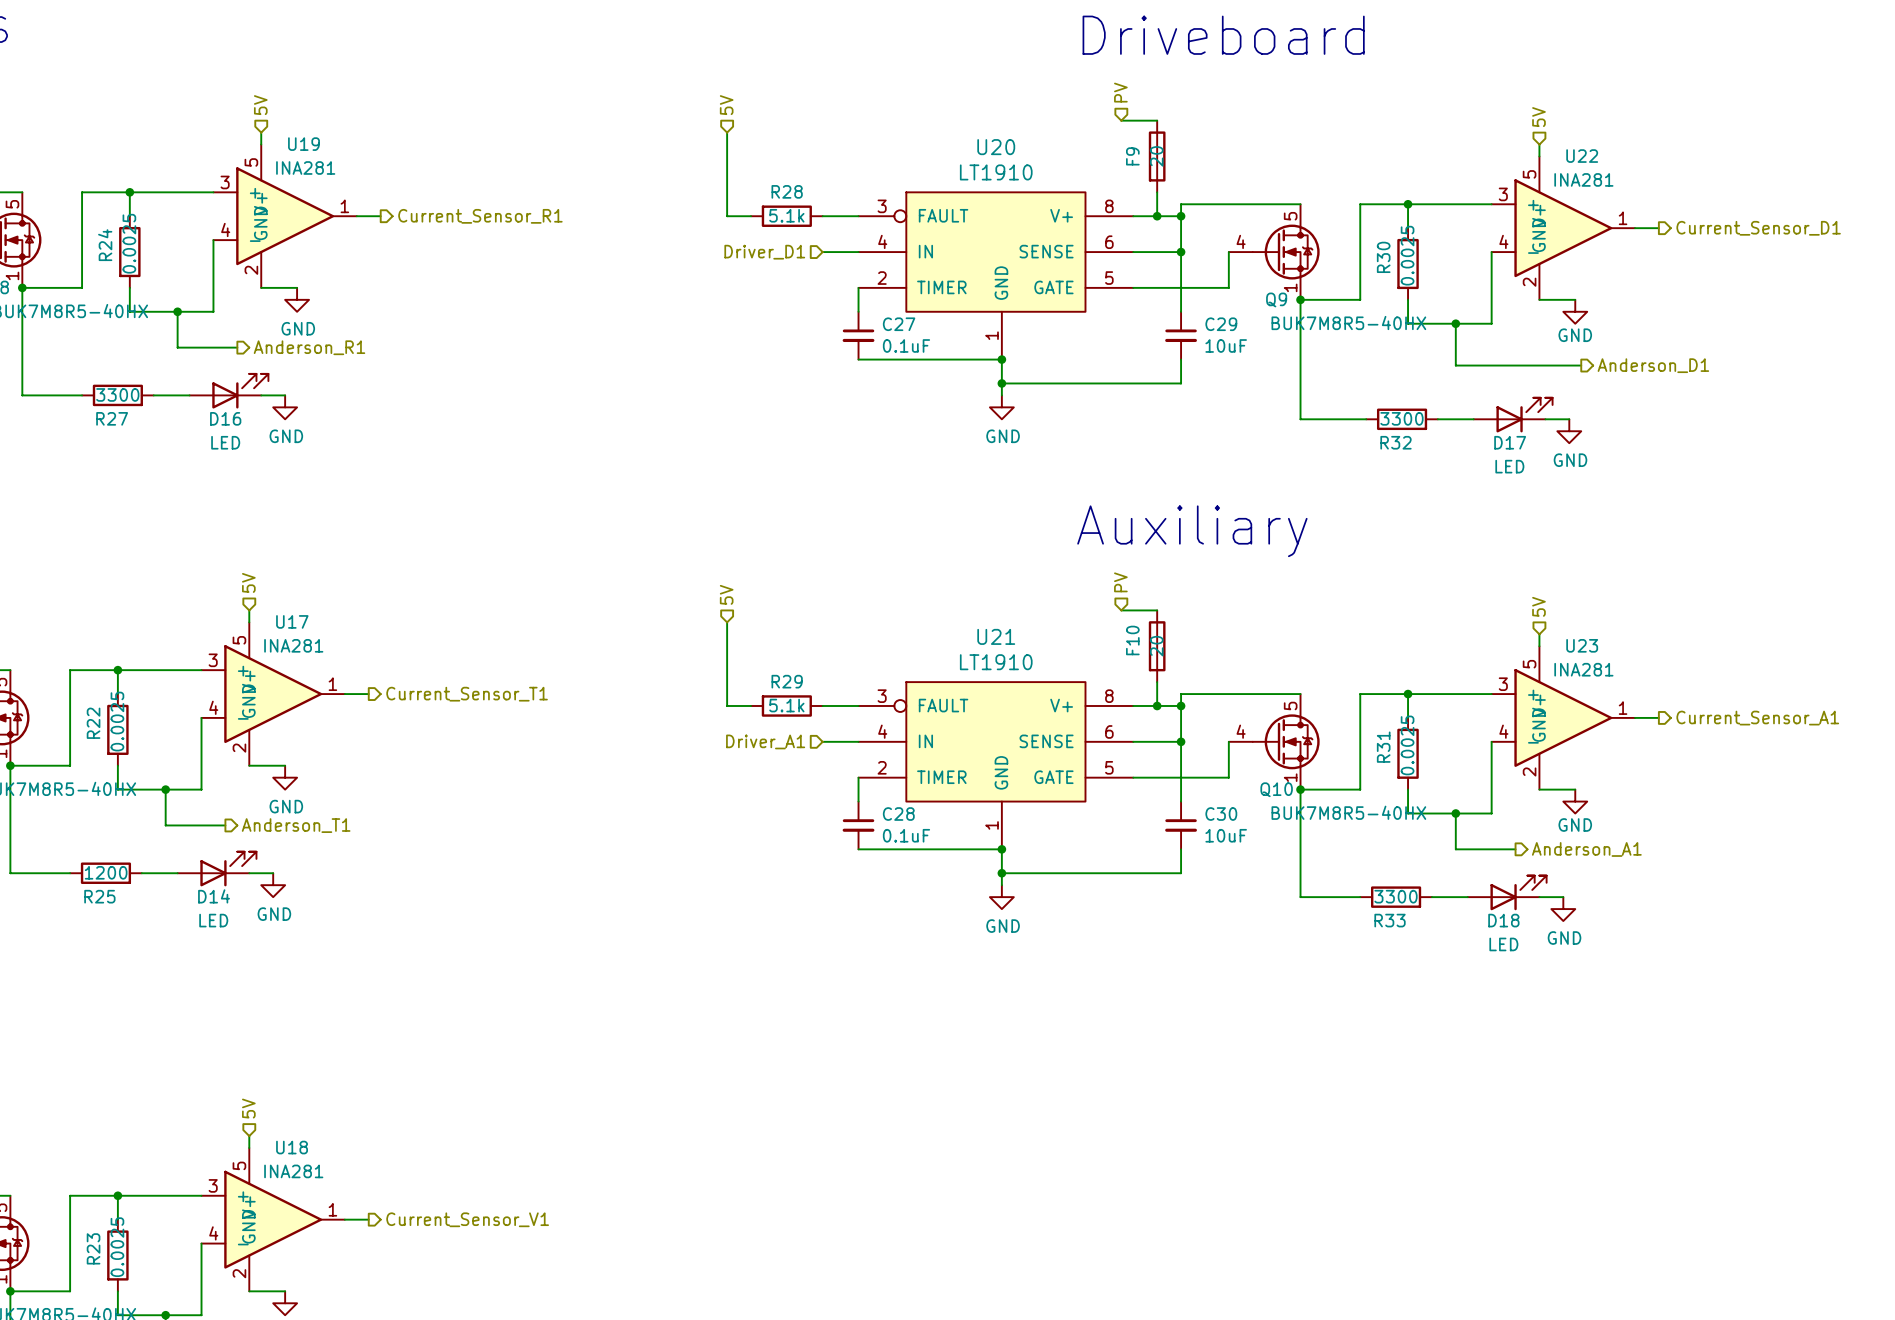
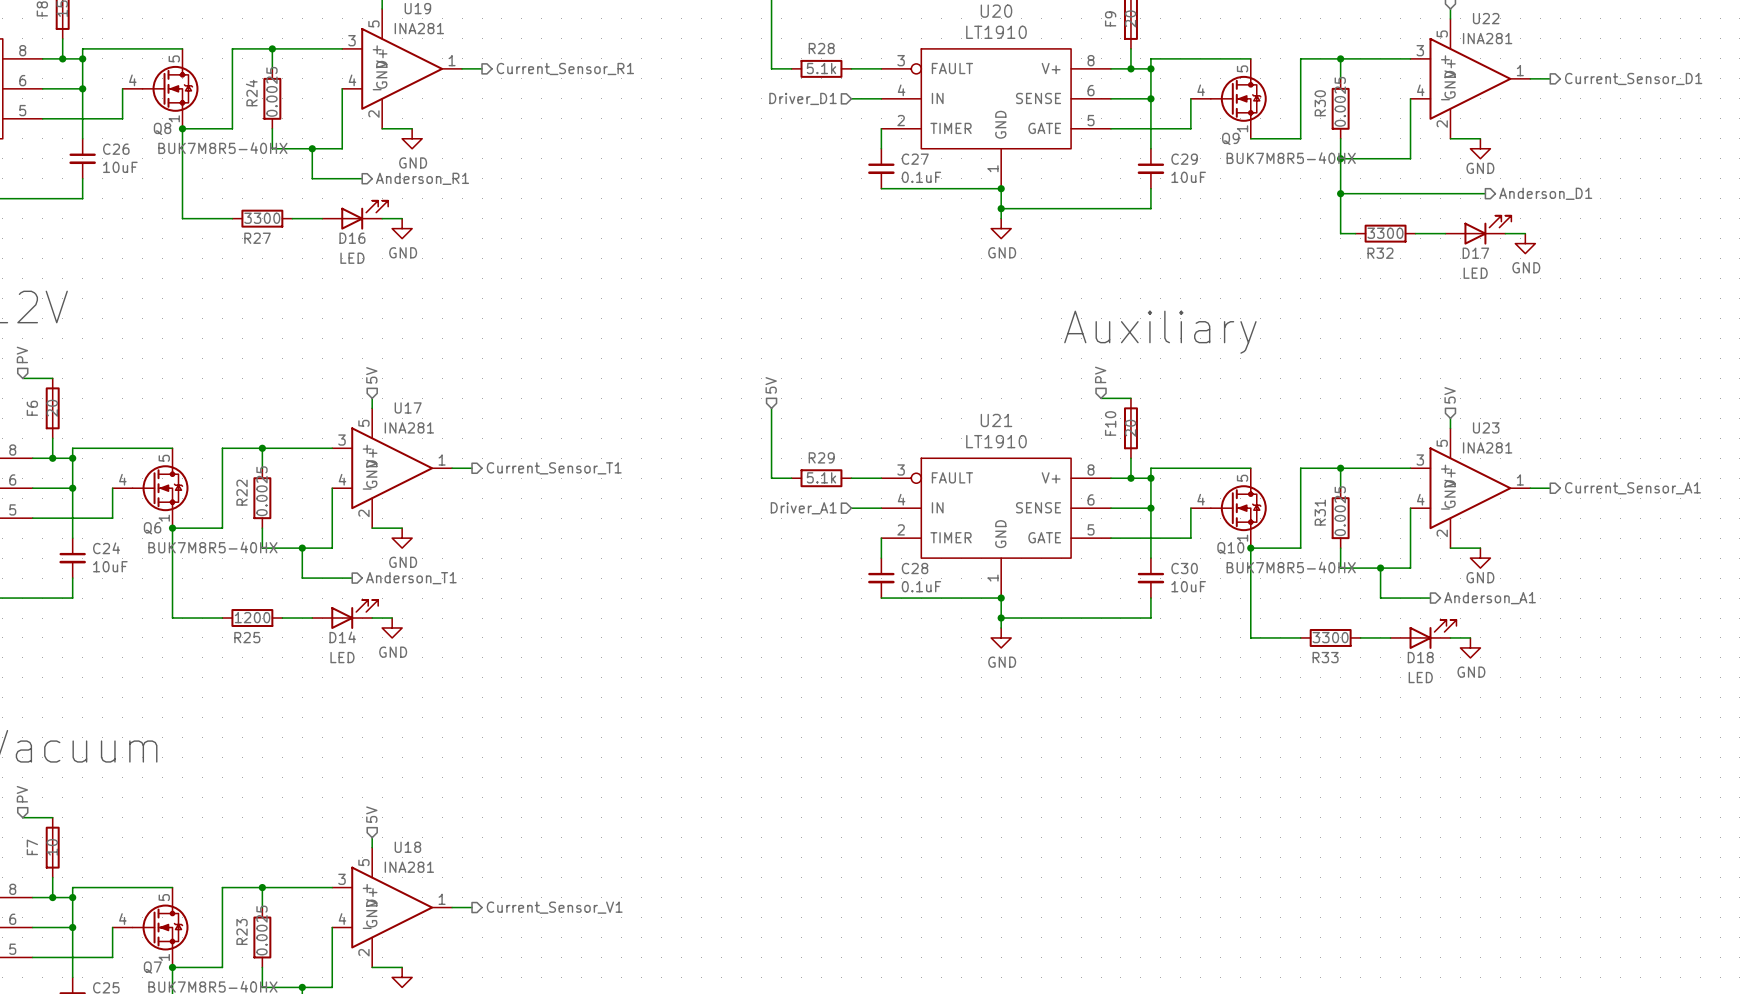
wire: (1300, 299) (1300, 419) (1366, 419) -> none
junction: (1300, 299) -> none
wire: none -> (1340, 158) (1340, 233) (1355, 233)
junction: none -> (1340, 158)
wire: (1455, 323) (1455, 365) -> (1340, 193) (1380, 193)
junction: (1455, 323) -> none
junction: none -> (1340, 193)
D17 position: (1513, 415) -> (1478, 230)
R32 position: (1402, 419) -> (1385, 233)
wire: (1545, 419) (1569, 419) -> (1505, 233) (1525, 233)
power symbol position: GND (1569, 431) -> GND (1525, 243)

